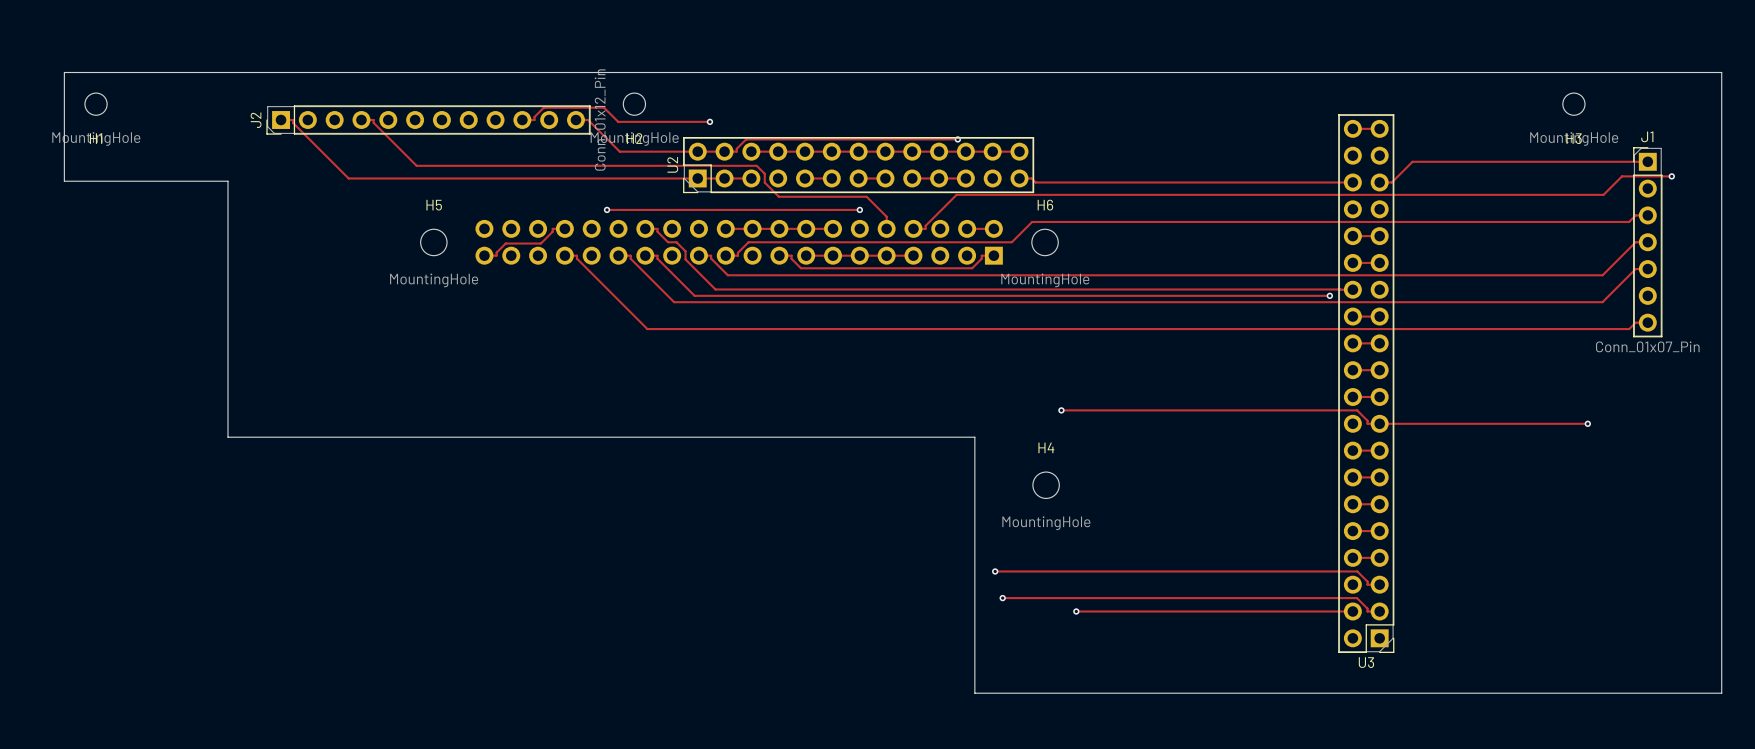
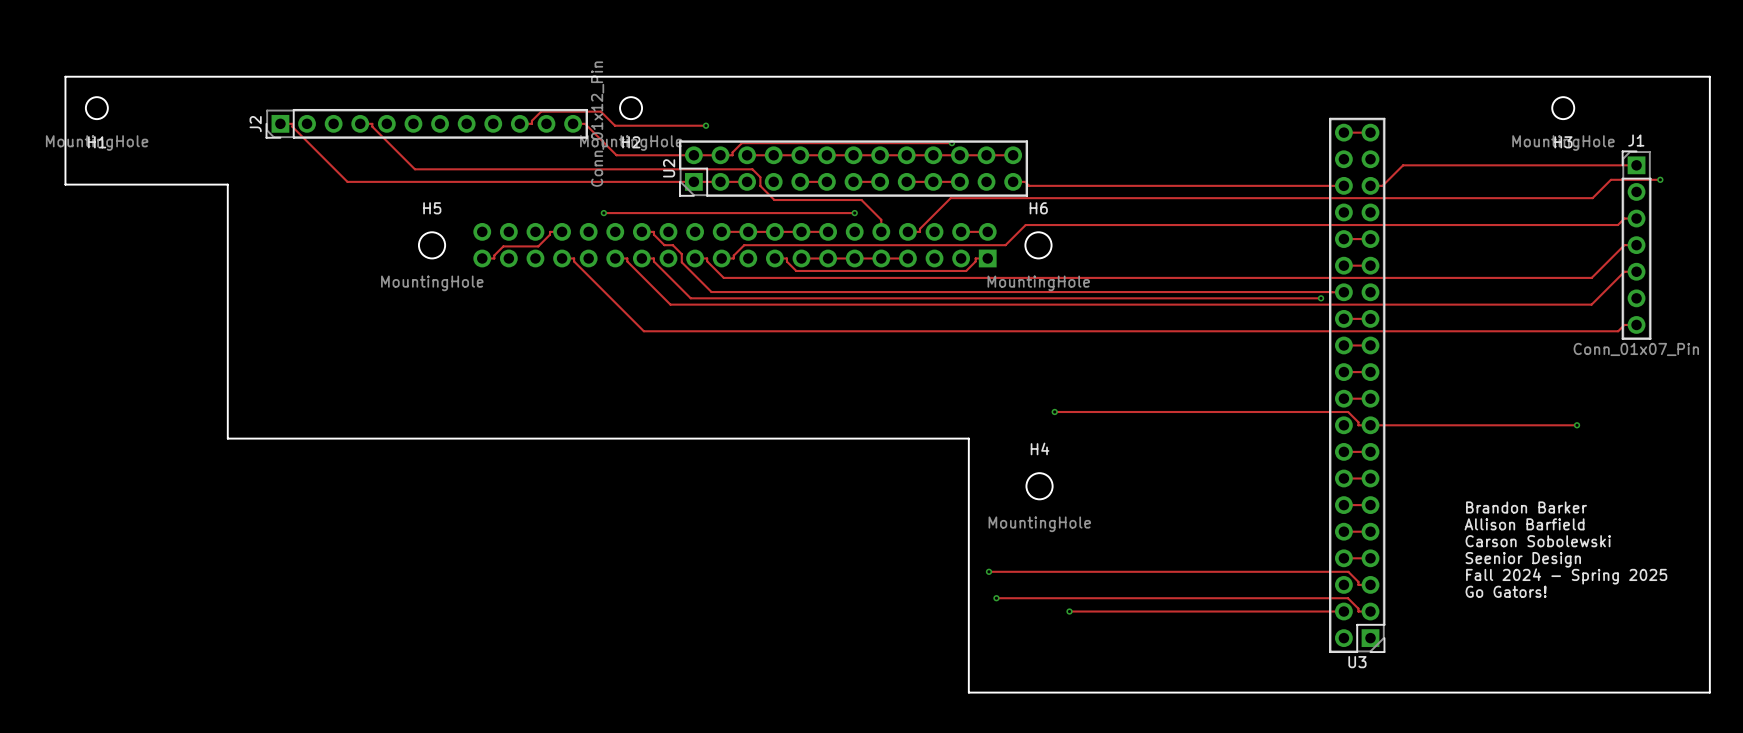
text: none -> Brandon Barker (1526, 507)
text: none -> Allison Barfield (1524, 524)
text: none -> Carson Sobolewski (1538, 541)
text: none -> Seenior Design (1523, 559)
text: none -> Fall 2024 - Spring 2025 (1566, 576)
text: none -> Go Gators! (1506, 591)

